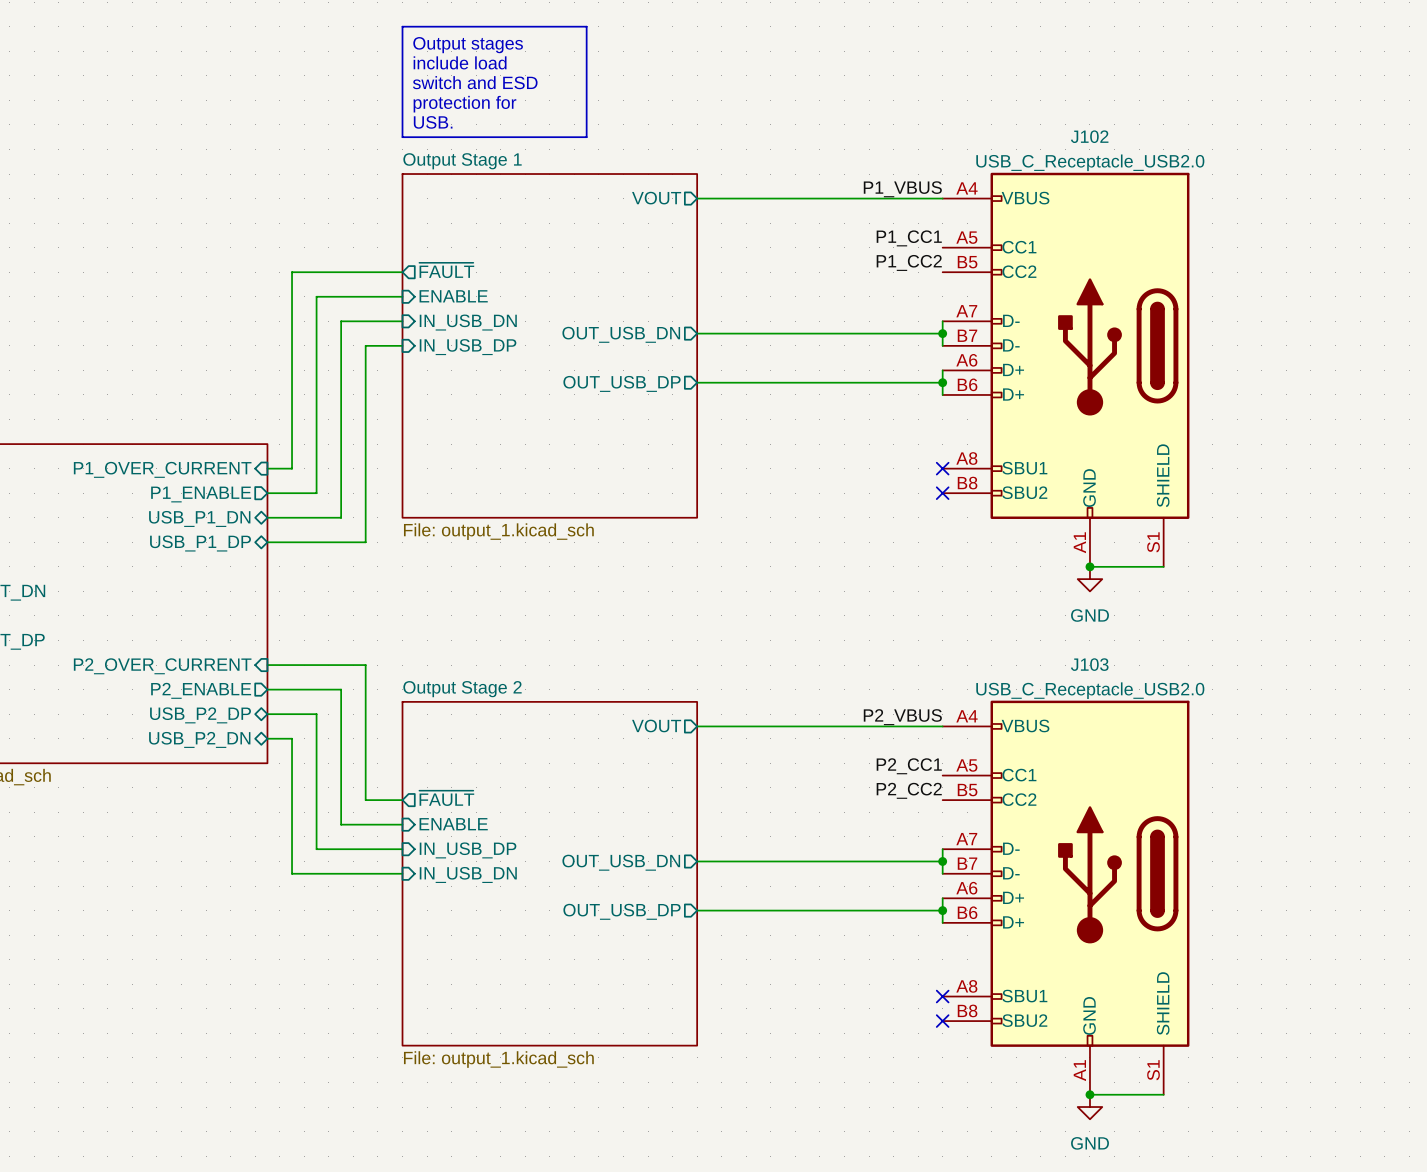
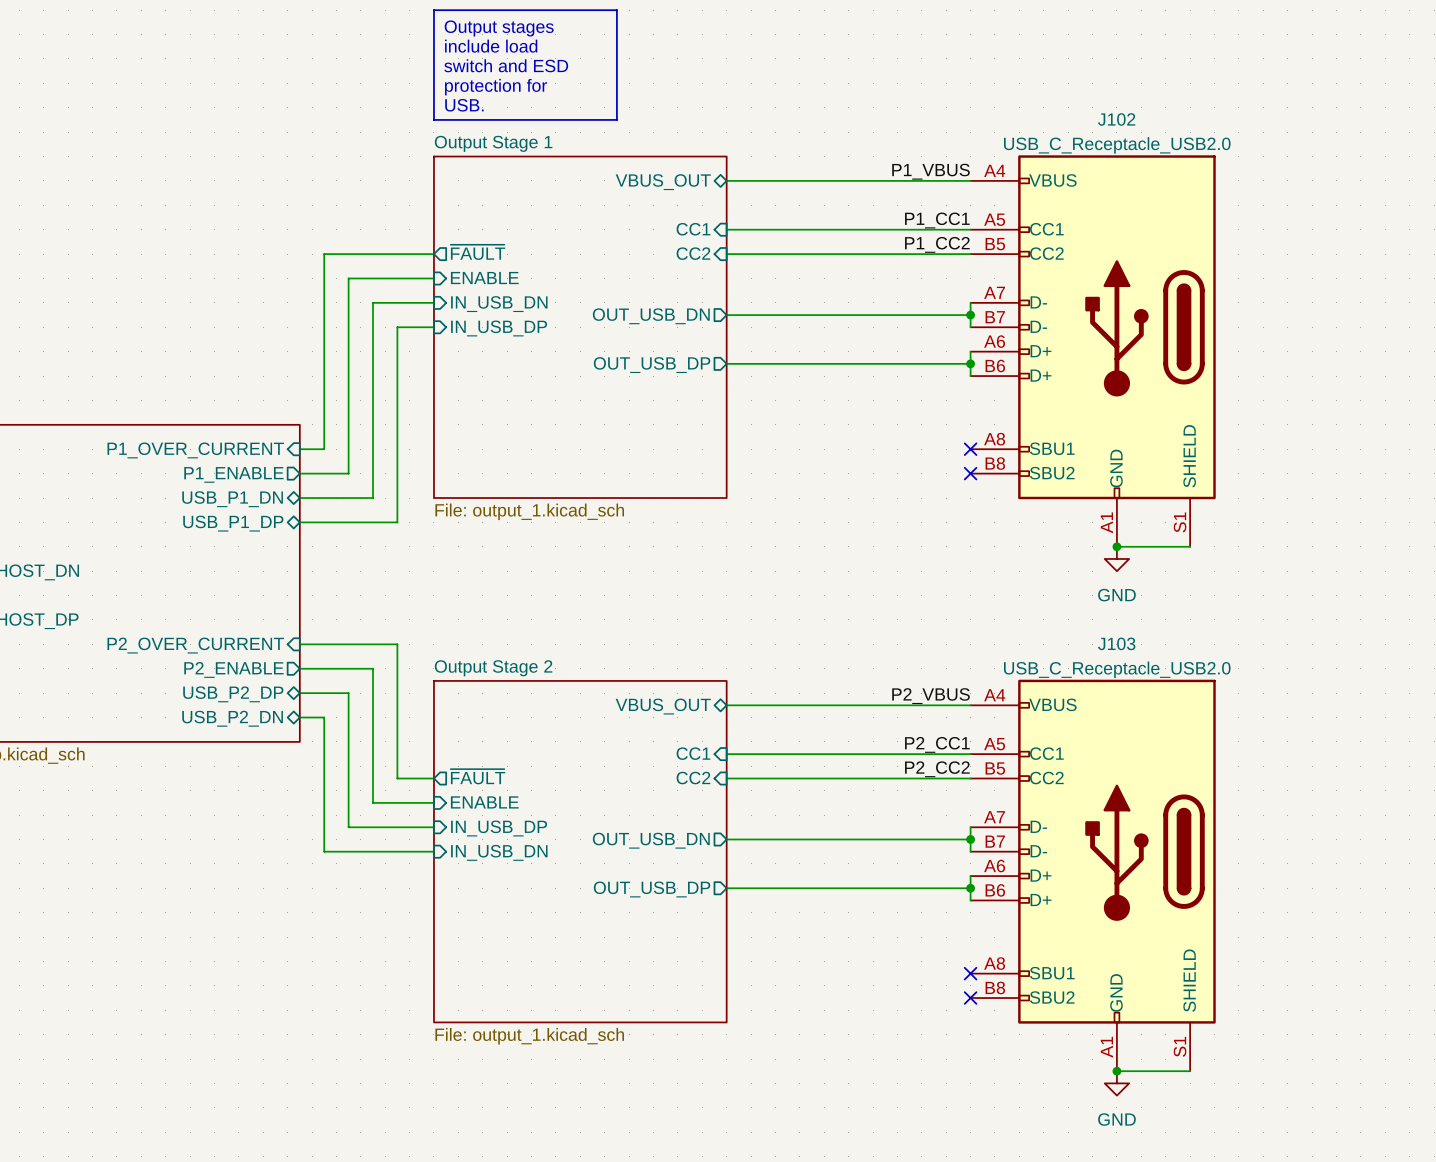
sheet pin shape: output (656, 198) -> bidirectional (663, 182)
sheet pin: VOUT (656, 198) -> VBUS_OUT (663, 182)
sheet pin: none -> CC1 (693, 229)
wire: none -> (726, 229) (970, 229)
sheet pin: none -> CC2 (693, 253)
wire: none -> (726, 254) (970, 254)
sheet pin shape: output (656, 725) -> bidirectional (663, 706)
sheet pin: VOUT (656, 725) -> VBUS_OUT (663, 706)
sheet pin: none -> CC1 (693, 753)
wire: none -> (726, 754) (970, 754)
sheet pin: none -> CC2 (693, 778)
wire: none -> (726, 778) (970, 778)

